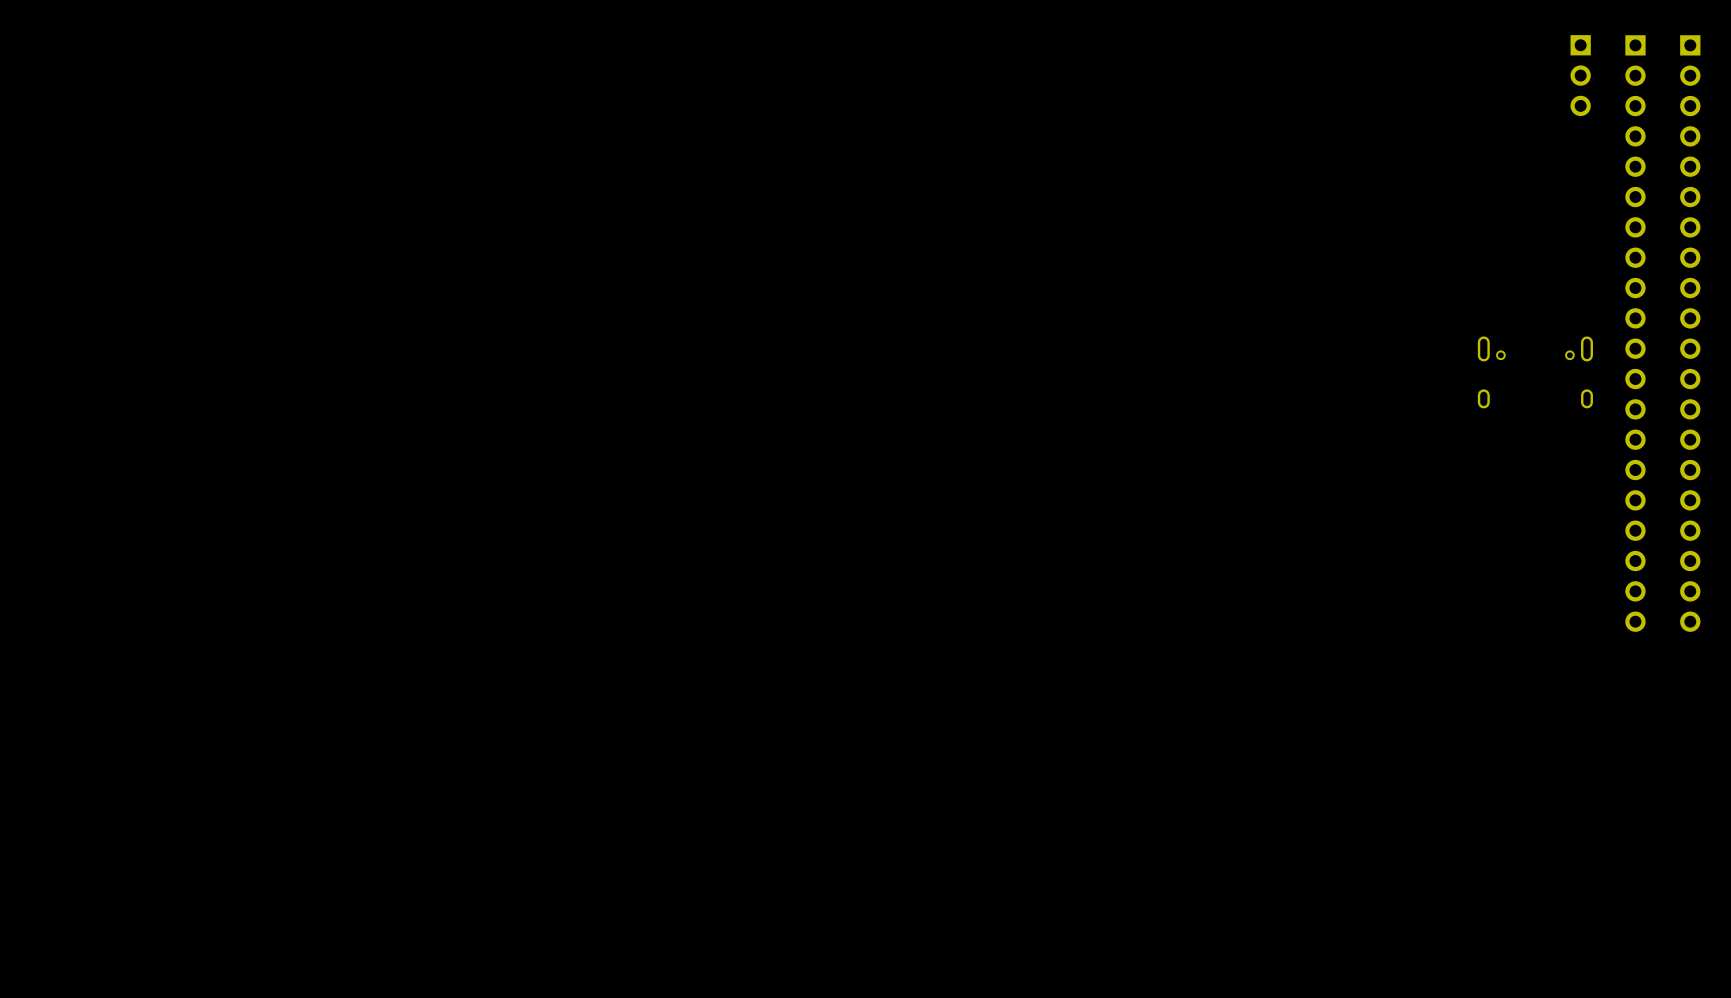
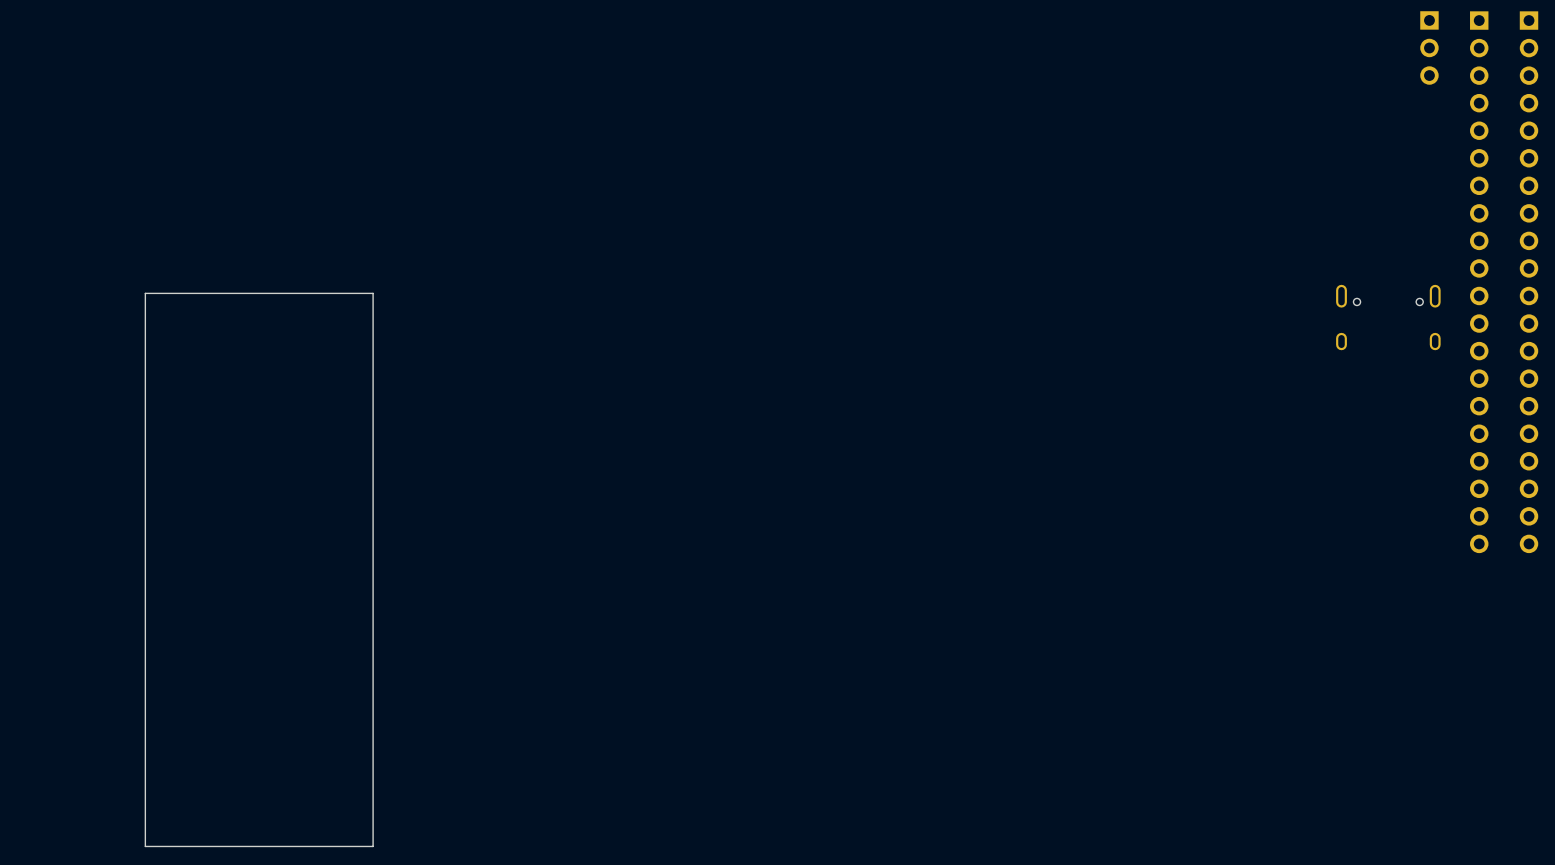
board edge: none -> (373, 293) (145, 293) (145, 846) (373, 846) (373, 293)

